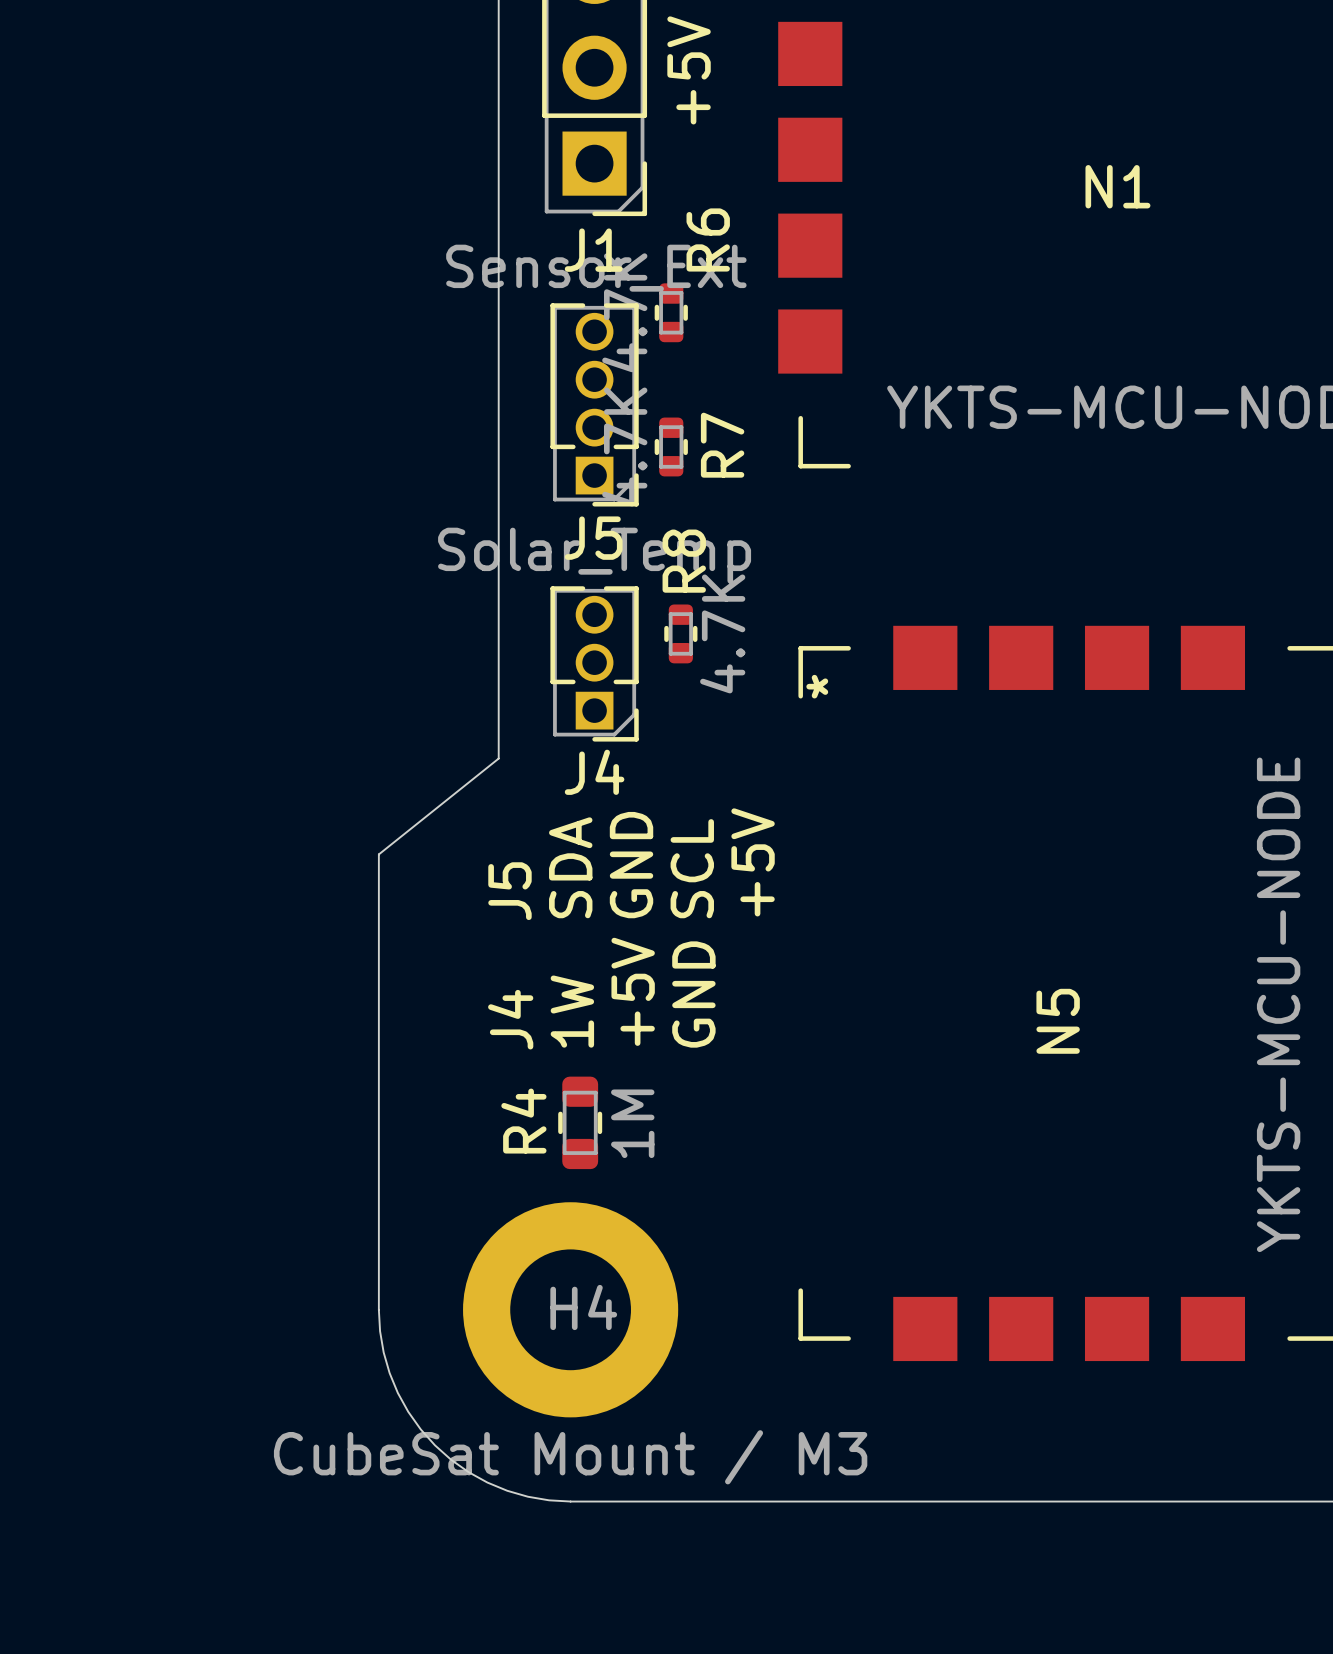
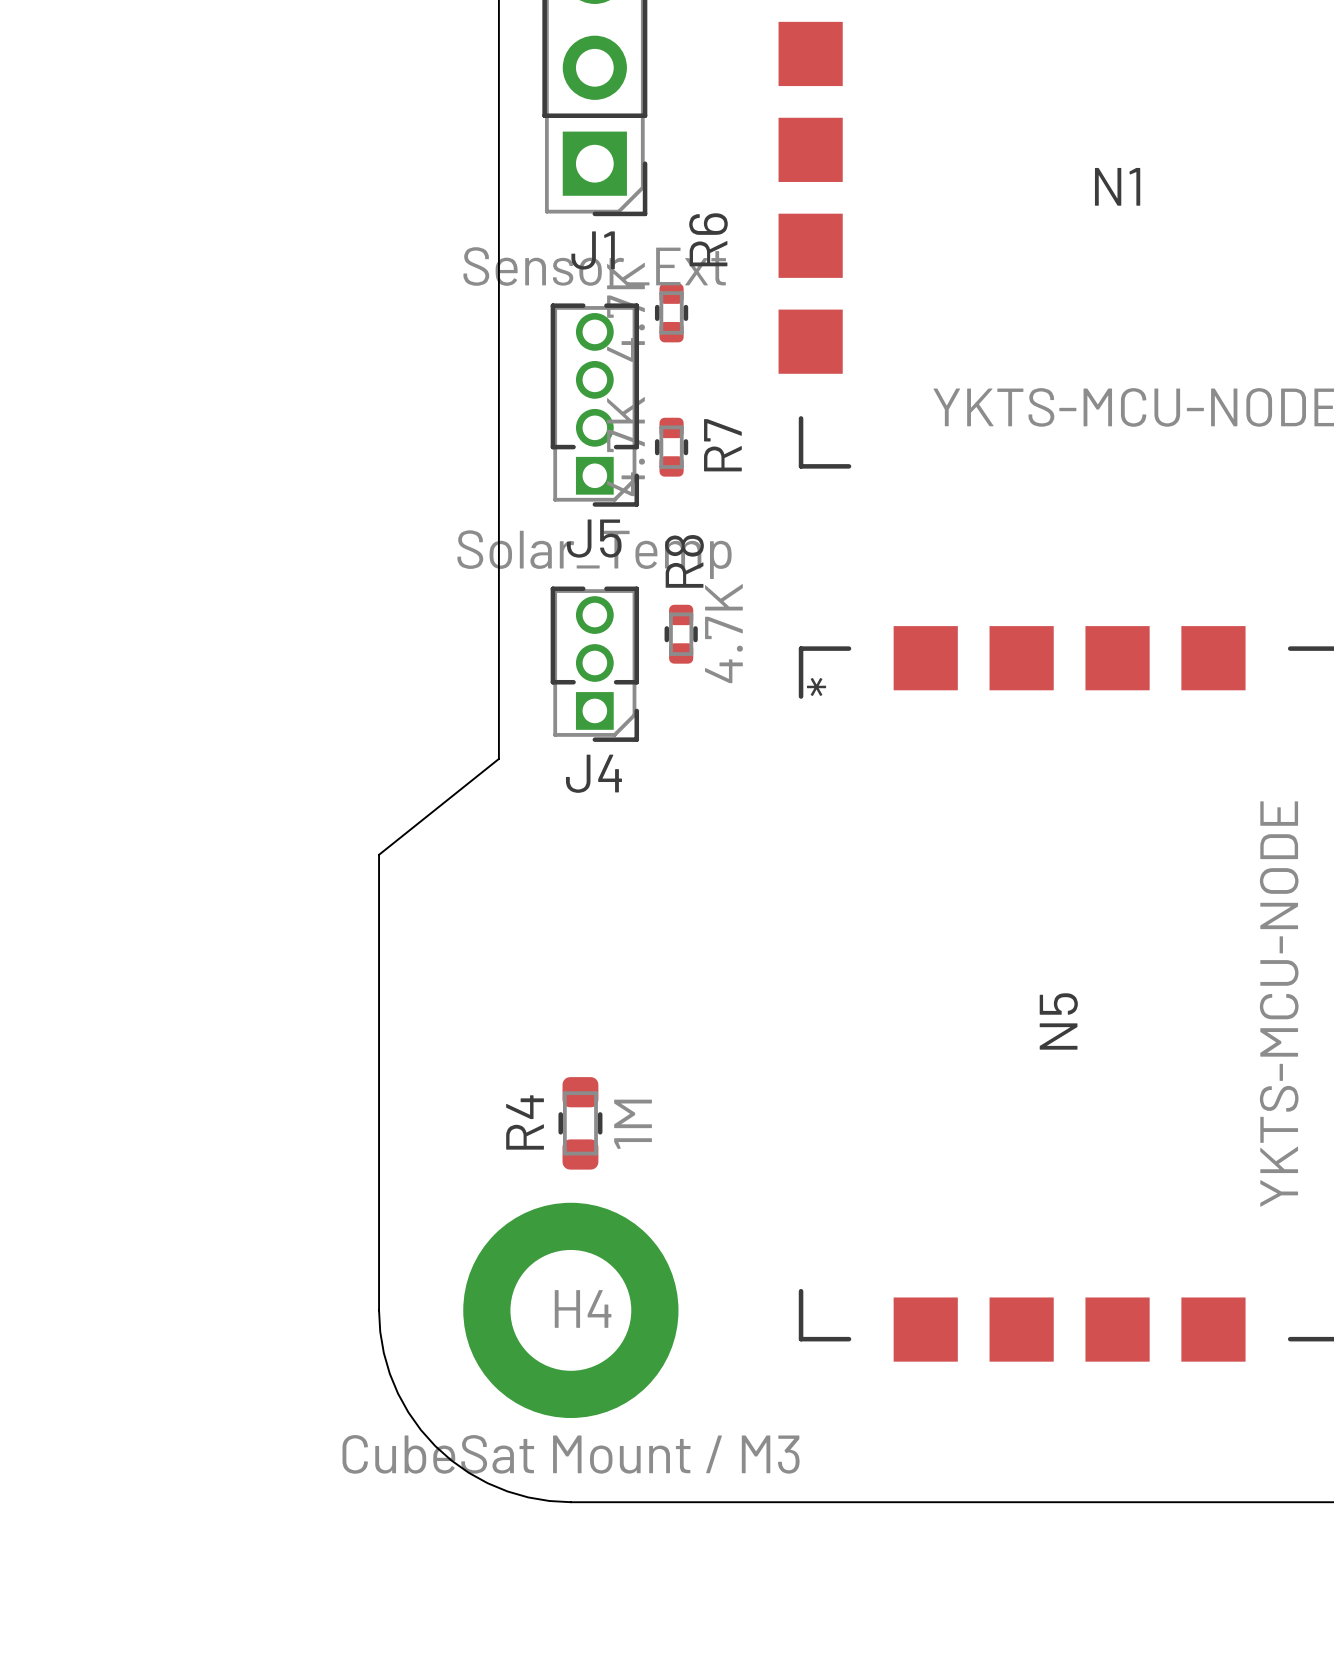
text: +5V (689, 70) -> none
text: +5V (753, 862) -> none
text: GND (631, 865) -> none
text: SDA (570, 867) -> none
text: SCL (692, 868) -> none
text: J5 (509, 891) -> none
text: +5V (633, 991) -> none
text: GND (693, 994) -> none
text: 1W (572, 1011) -> none
text: J4 (510, 1019) -> none

